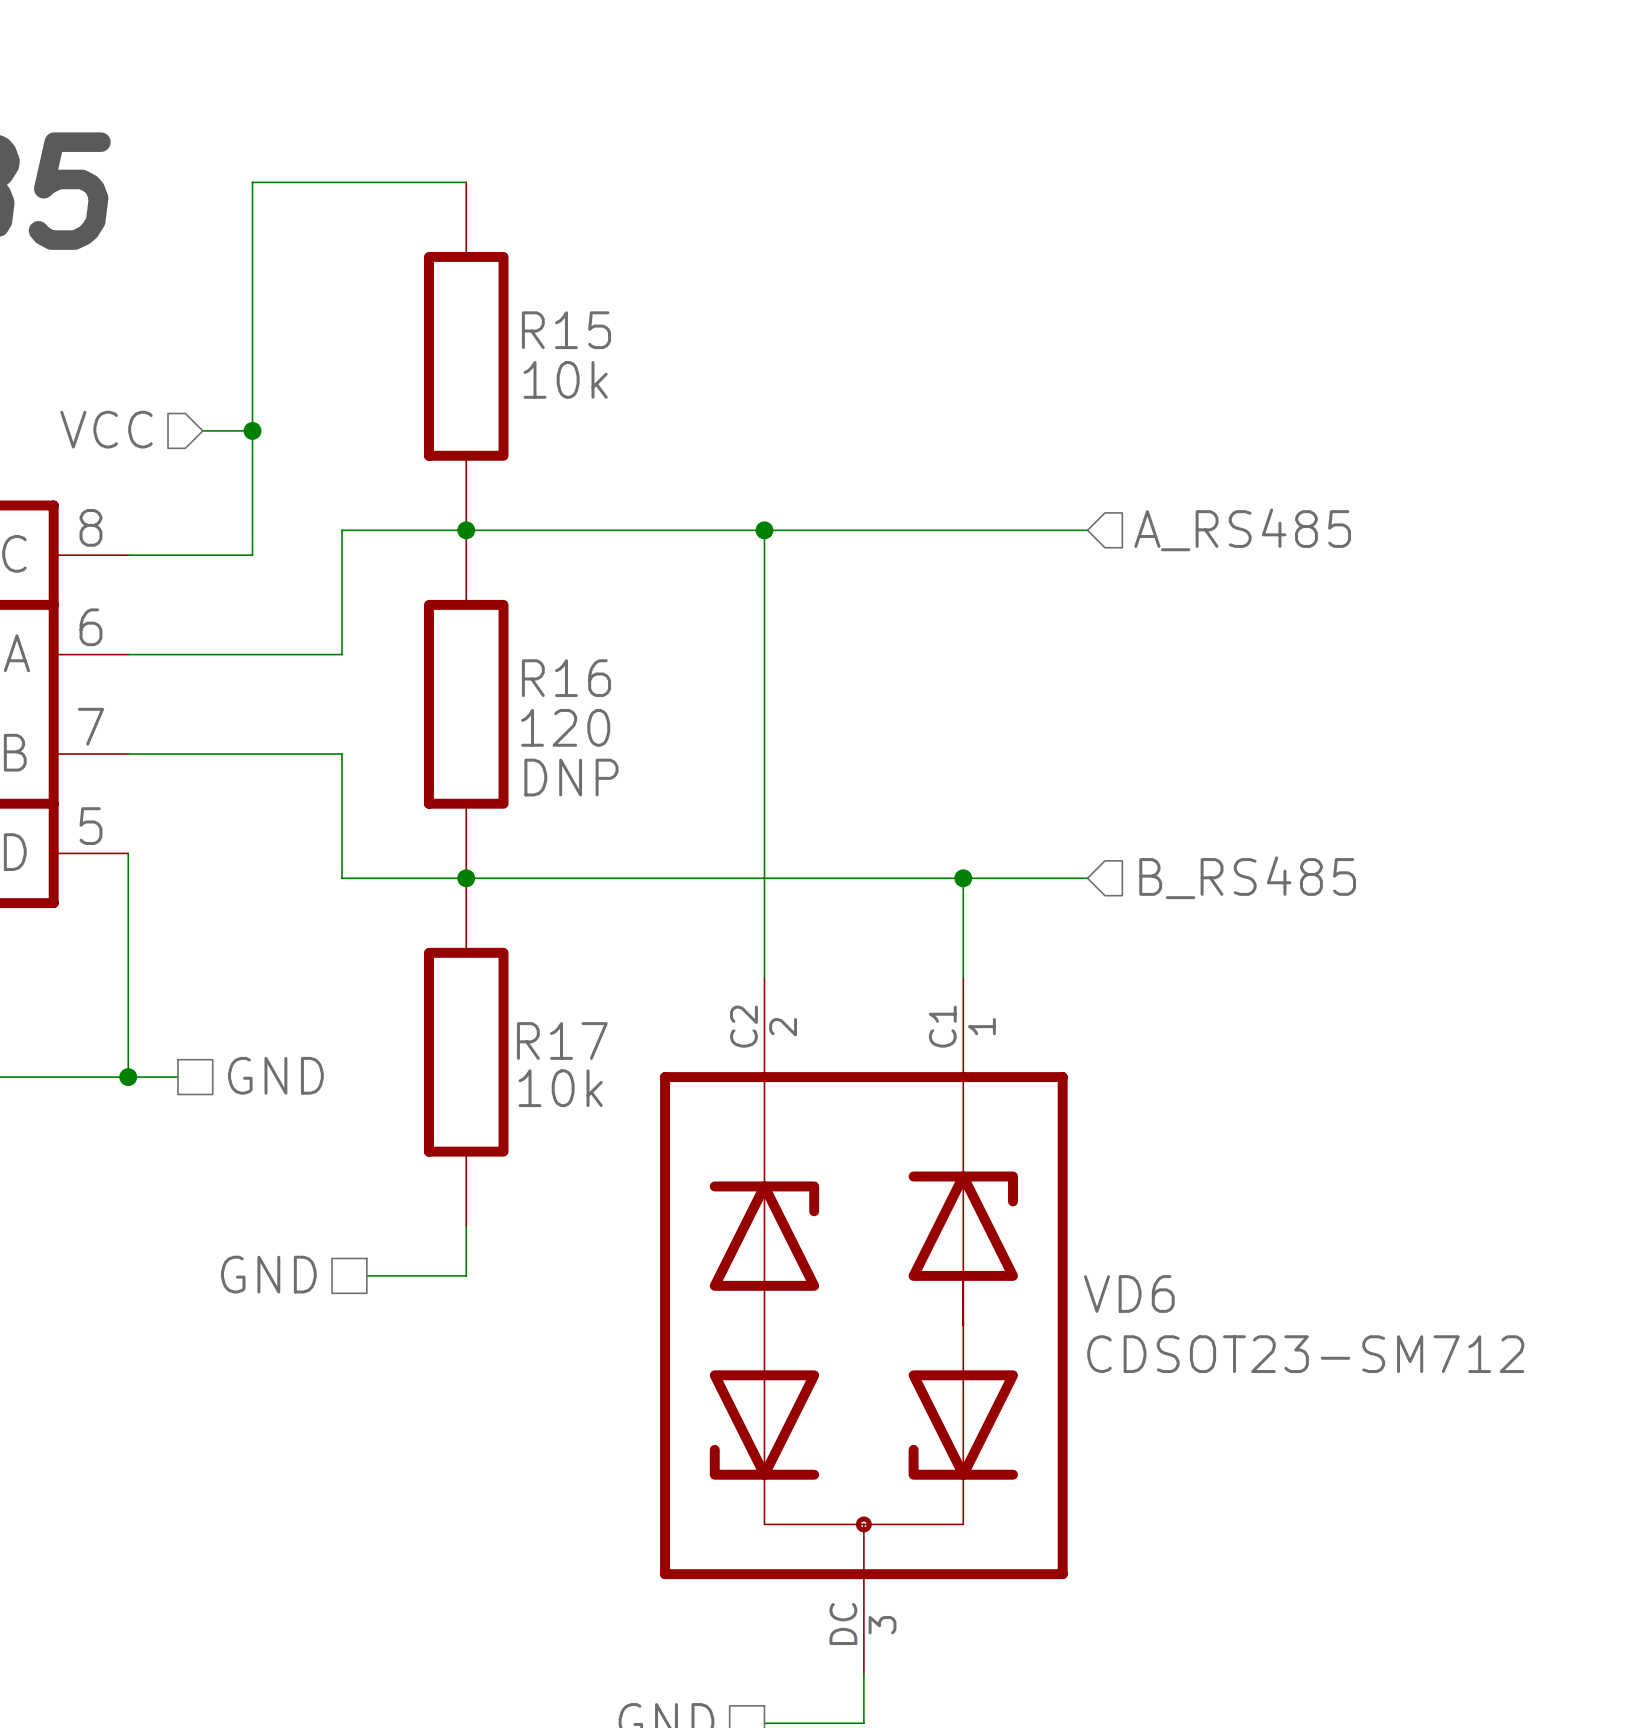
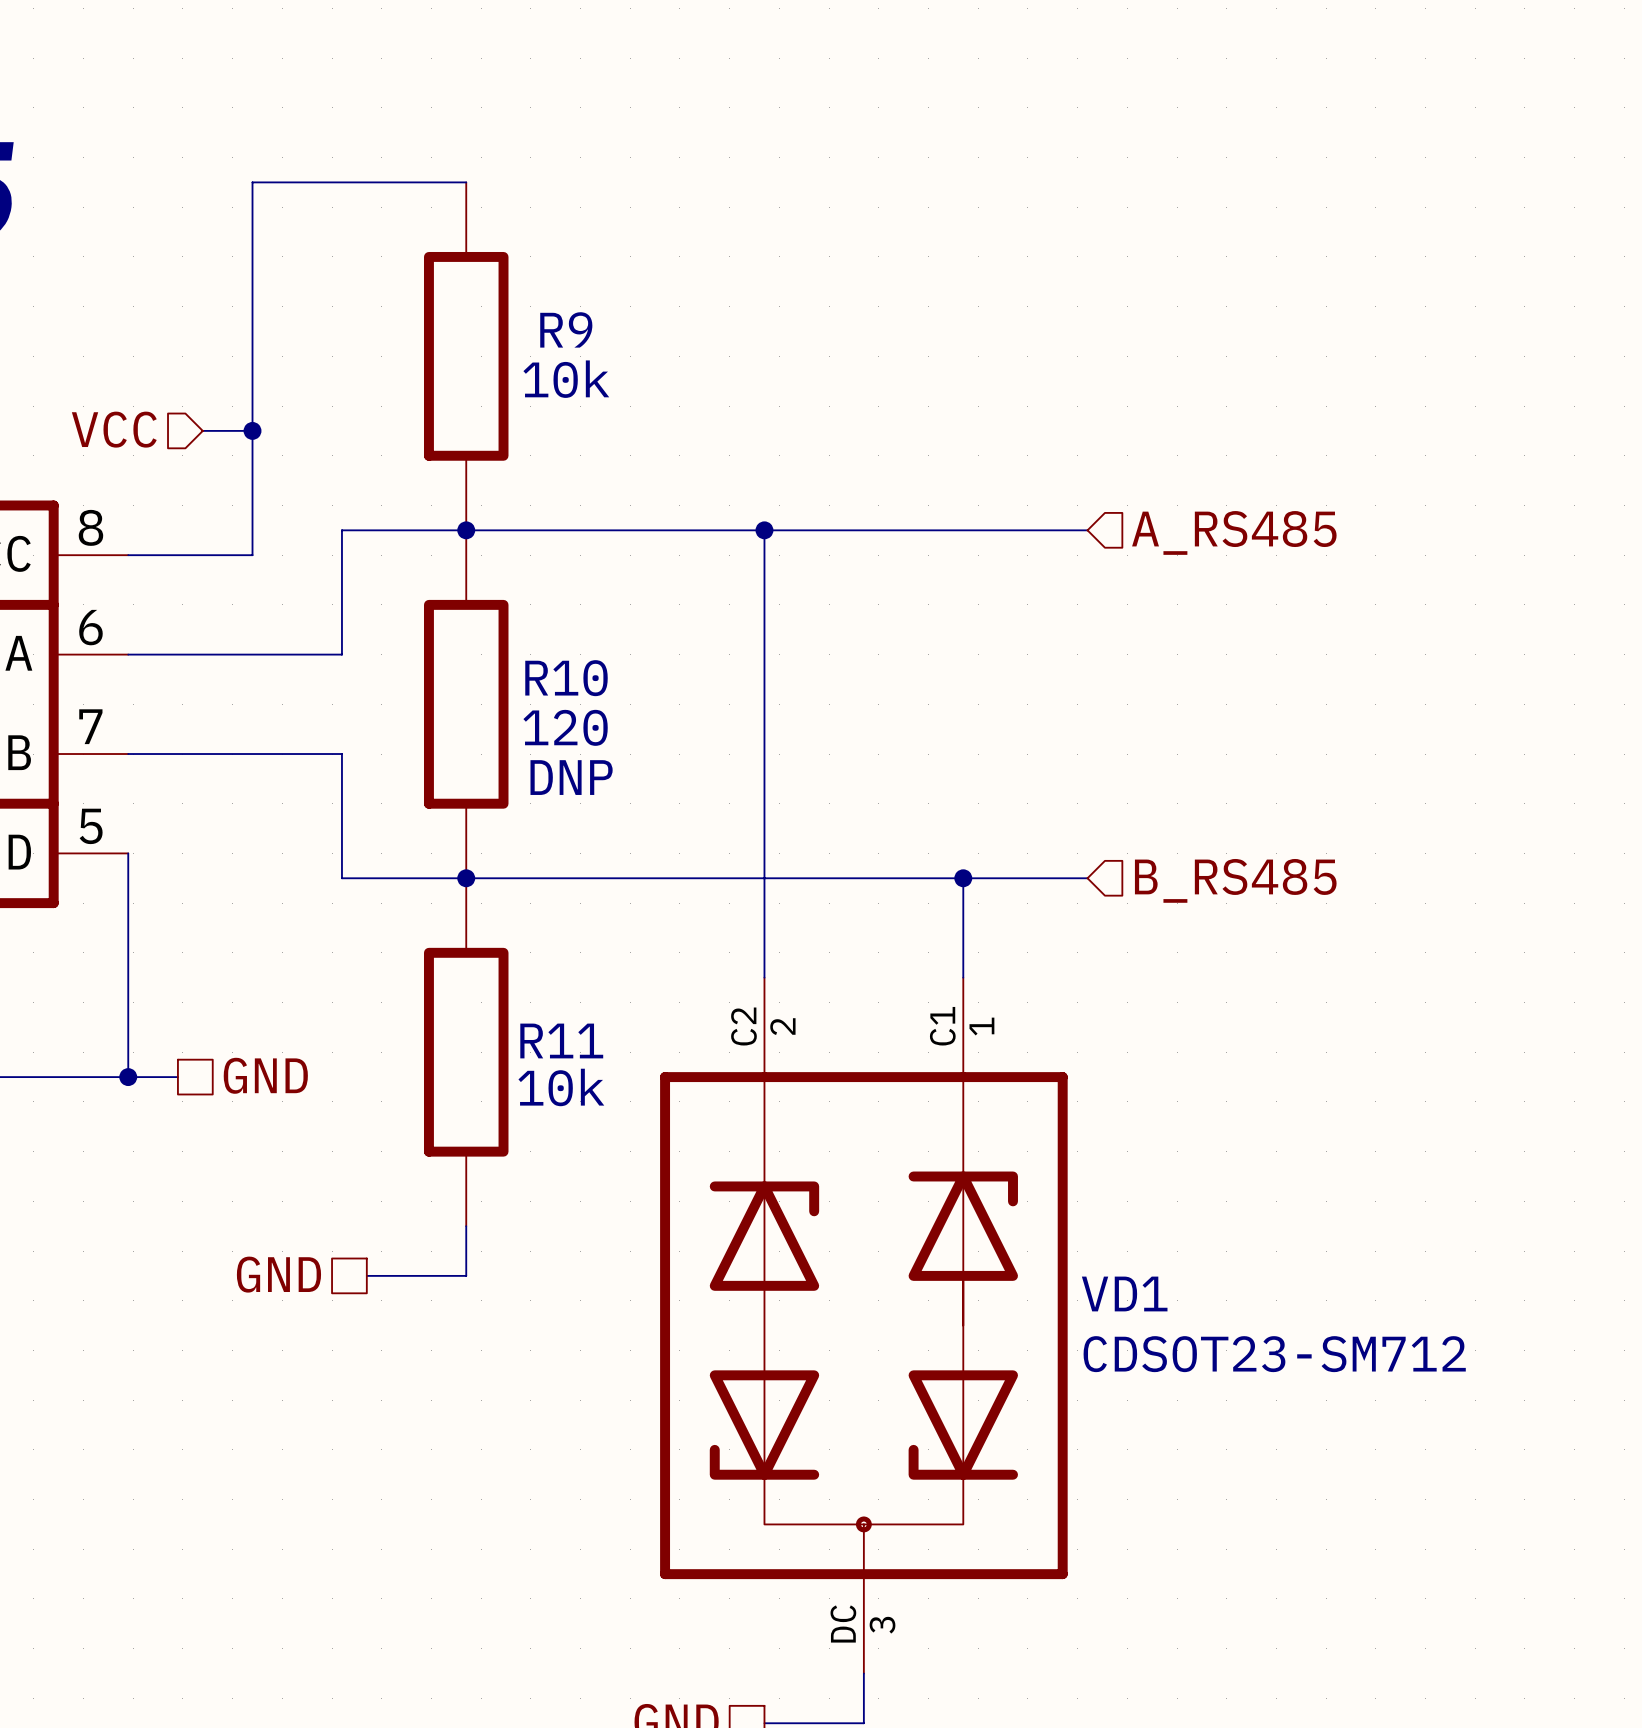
R15 name: R15 (566, 330) -> R9 (566, 329)
R16 name: R16 (566, 678) -> R10 (566, 678)
R17 name: R17 (562, 1040) -> R11 (561, 1040)
VD6 name: VD6 (1129, 1293) -> VD1 (1124, 1293)

